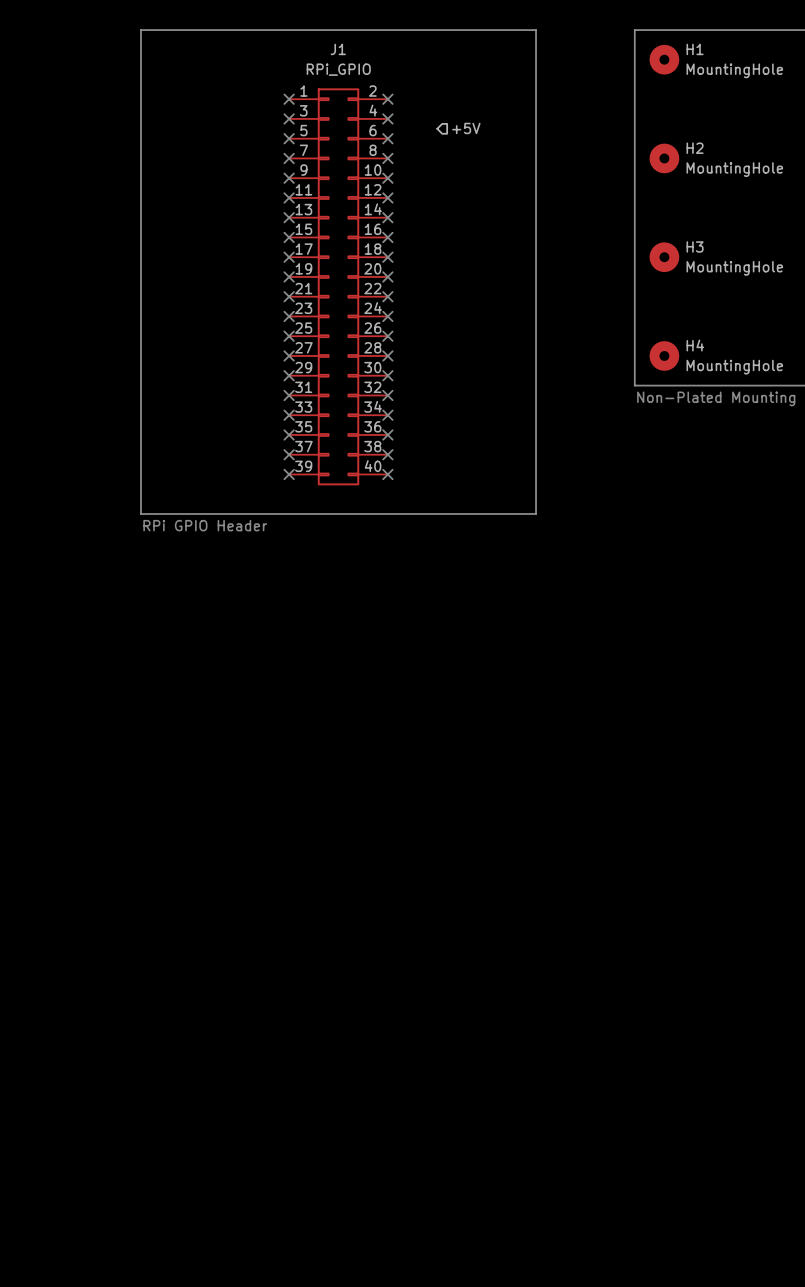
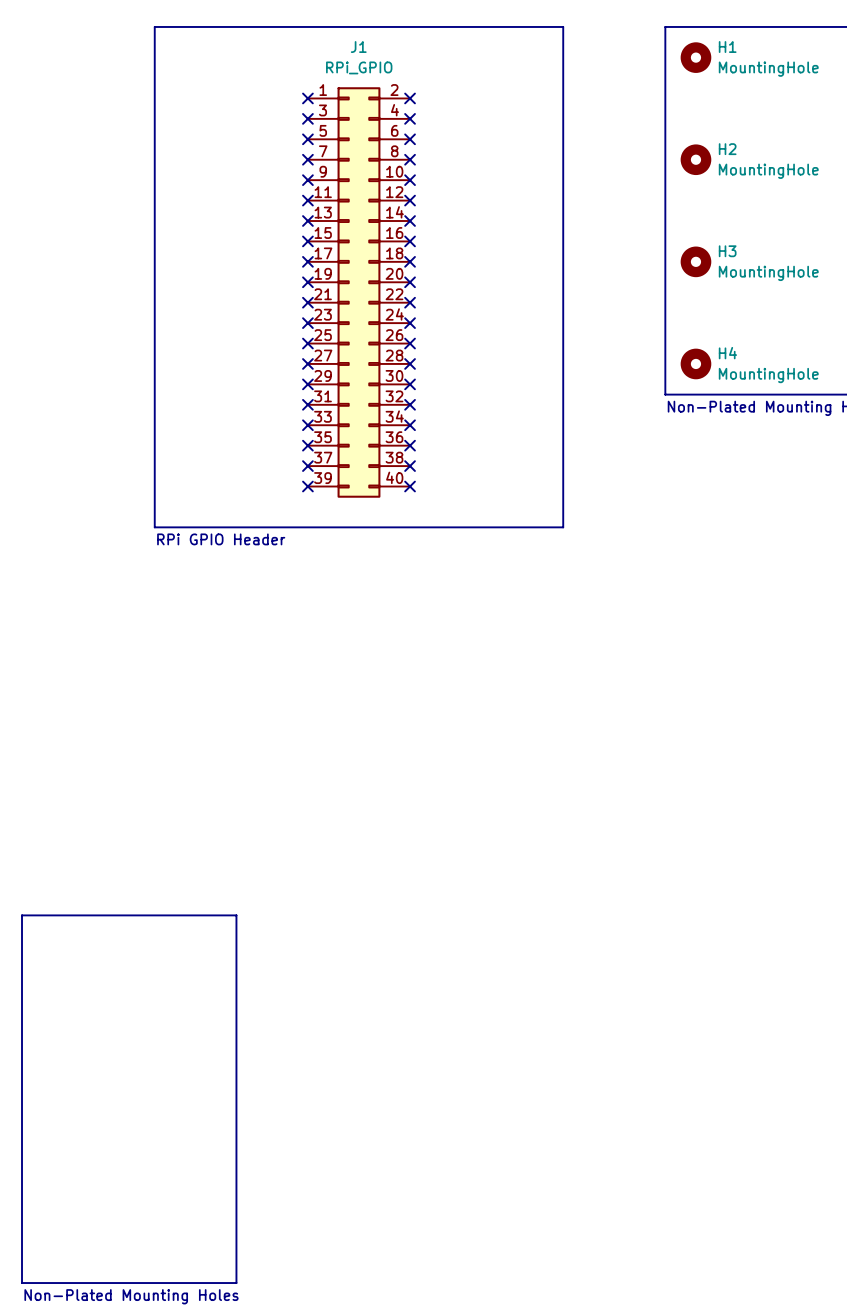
hierarchical label: +5V (466, 128) -> none
line: none -> (22, 915) (236, 915) (236, 1283) (22, 1283) (22, 915)
text: none -> Non-Plated Mounting Holes (131, 1296)

